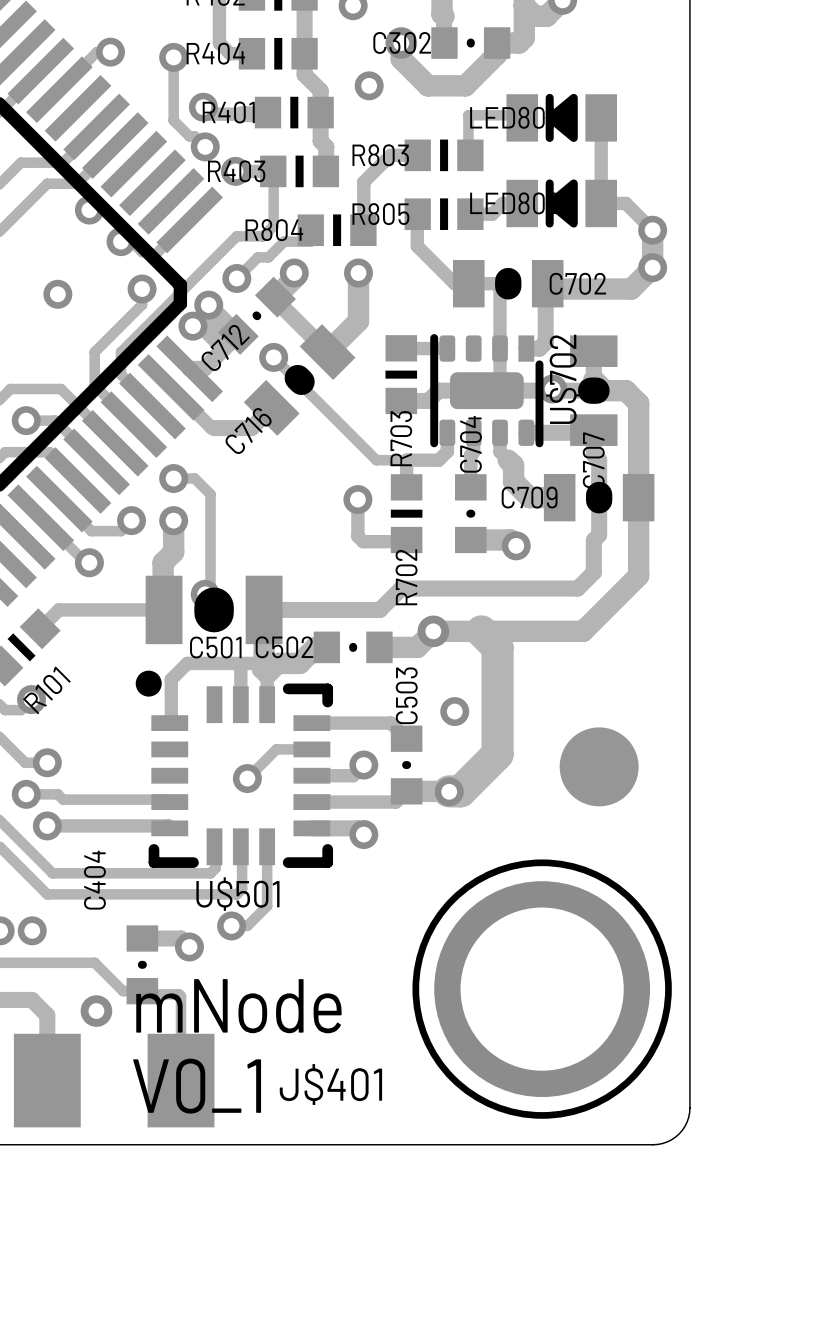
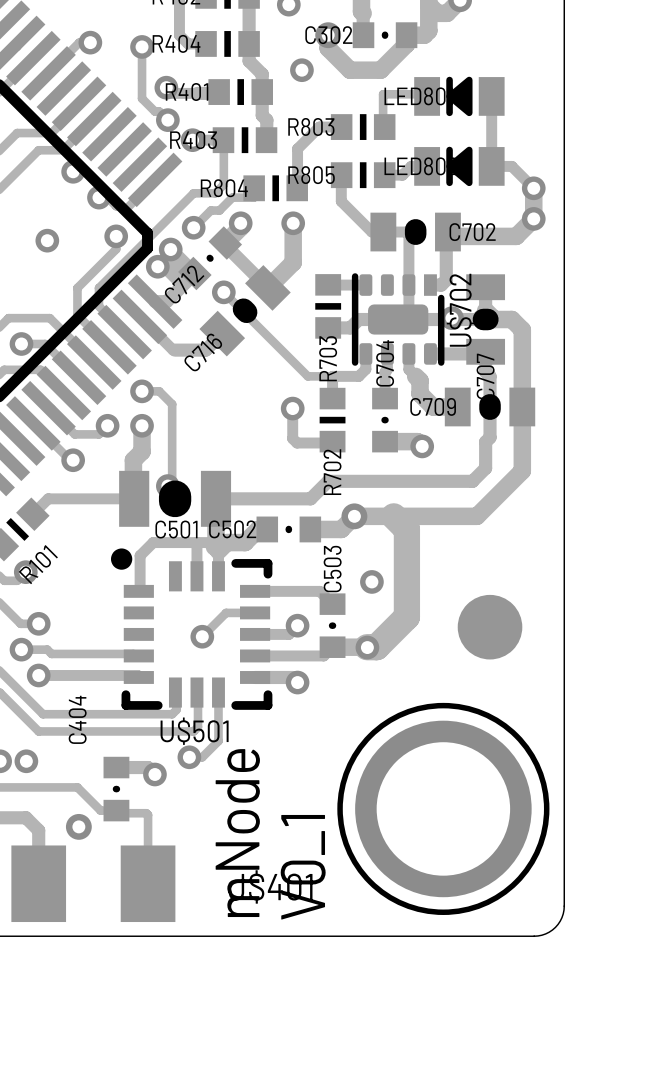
text rotation: 0° (238, 1006) -> 90° counterclockwise (237, 833)
text rotation: 0° (197, 1086) -> 90° counterclockwise (303, 867)

